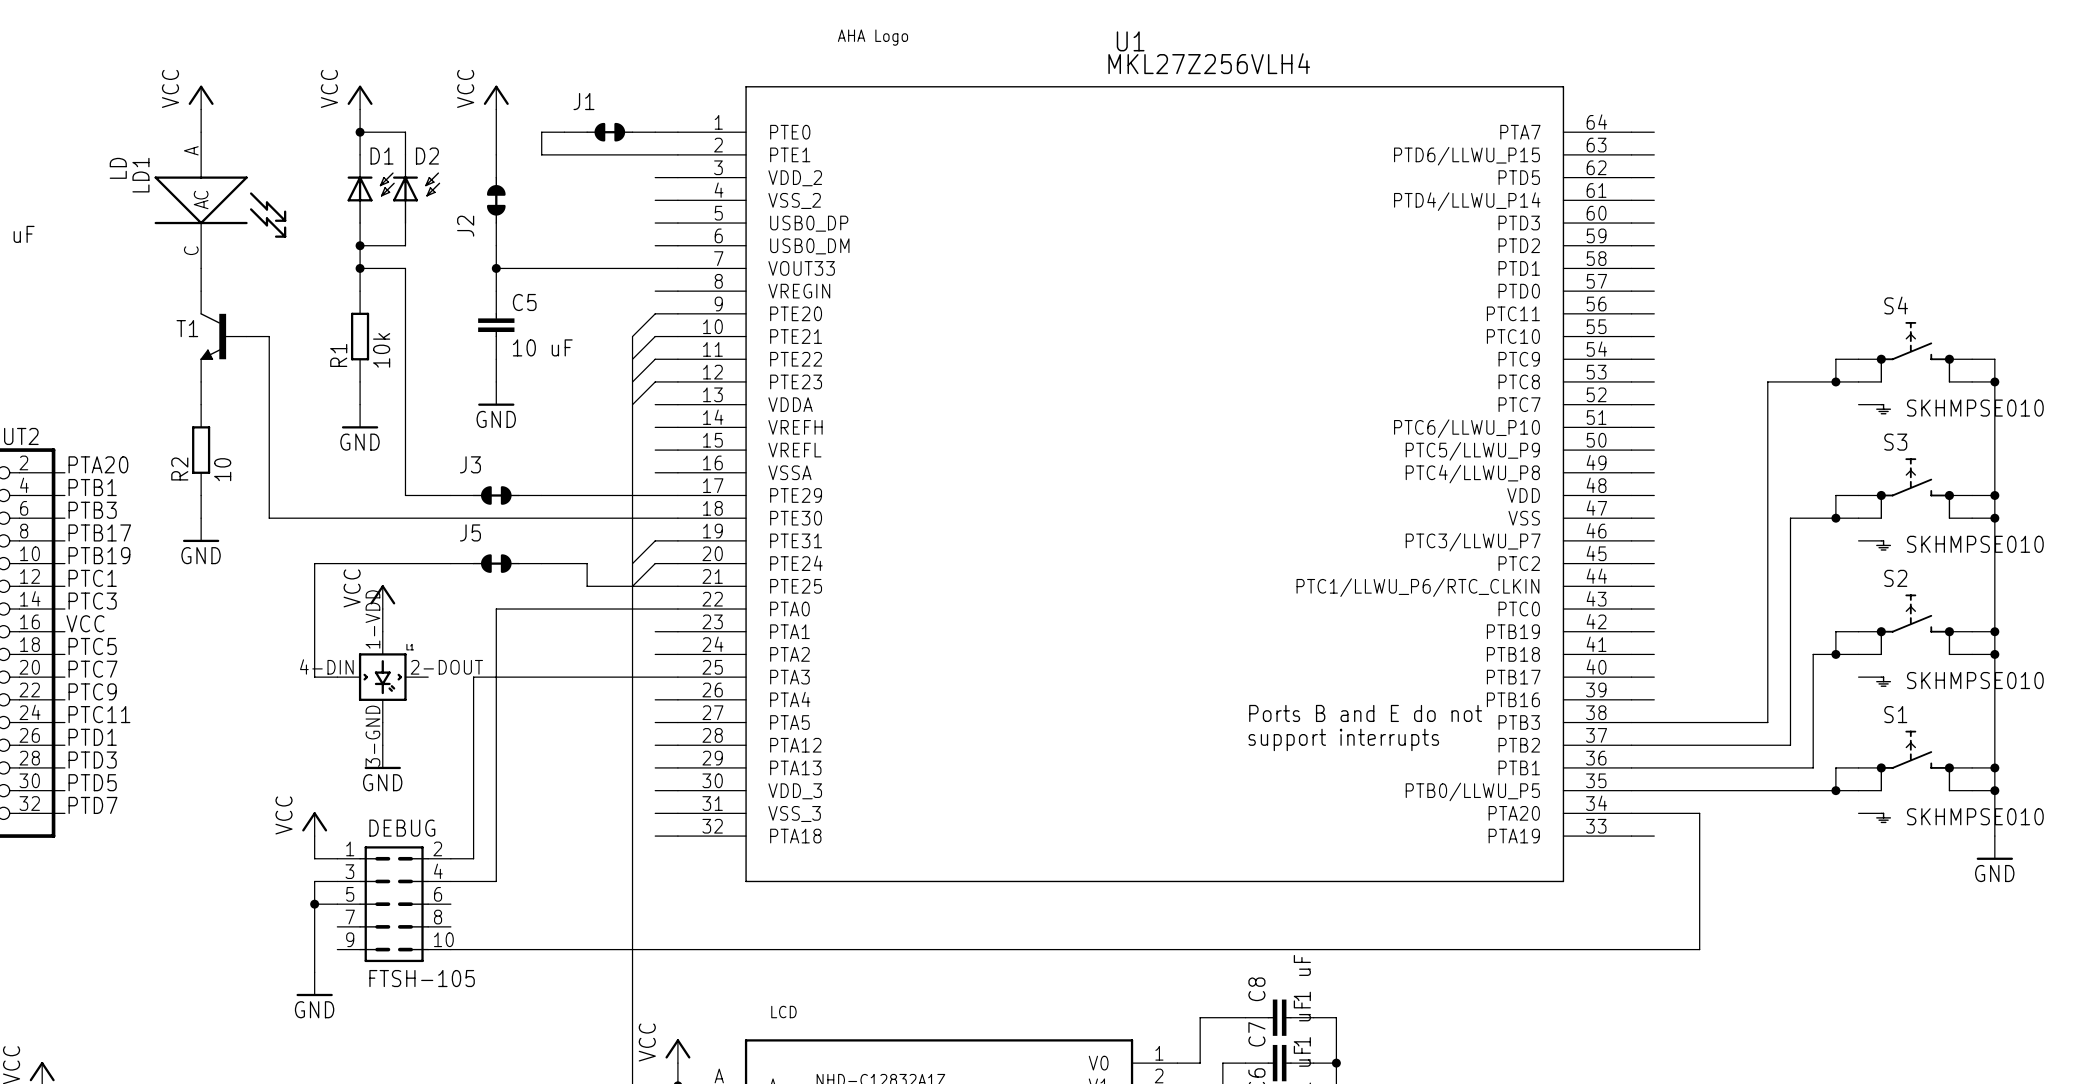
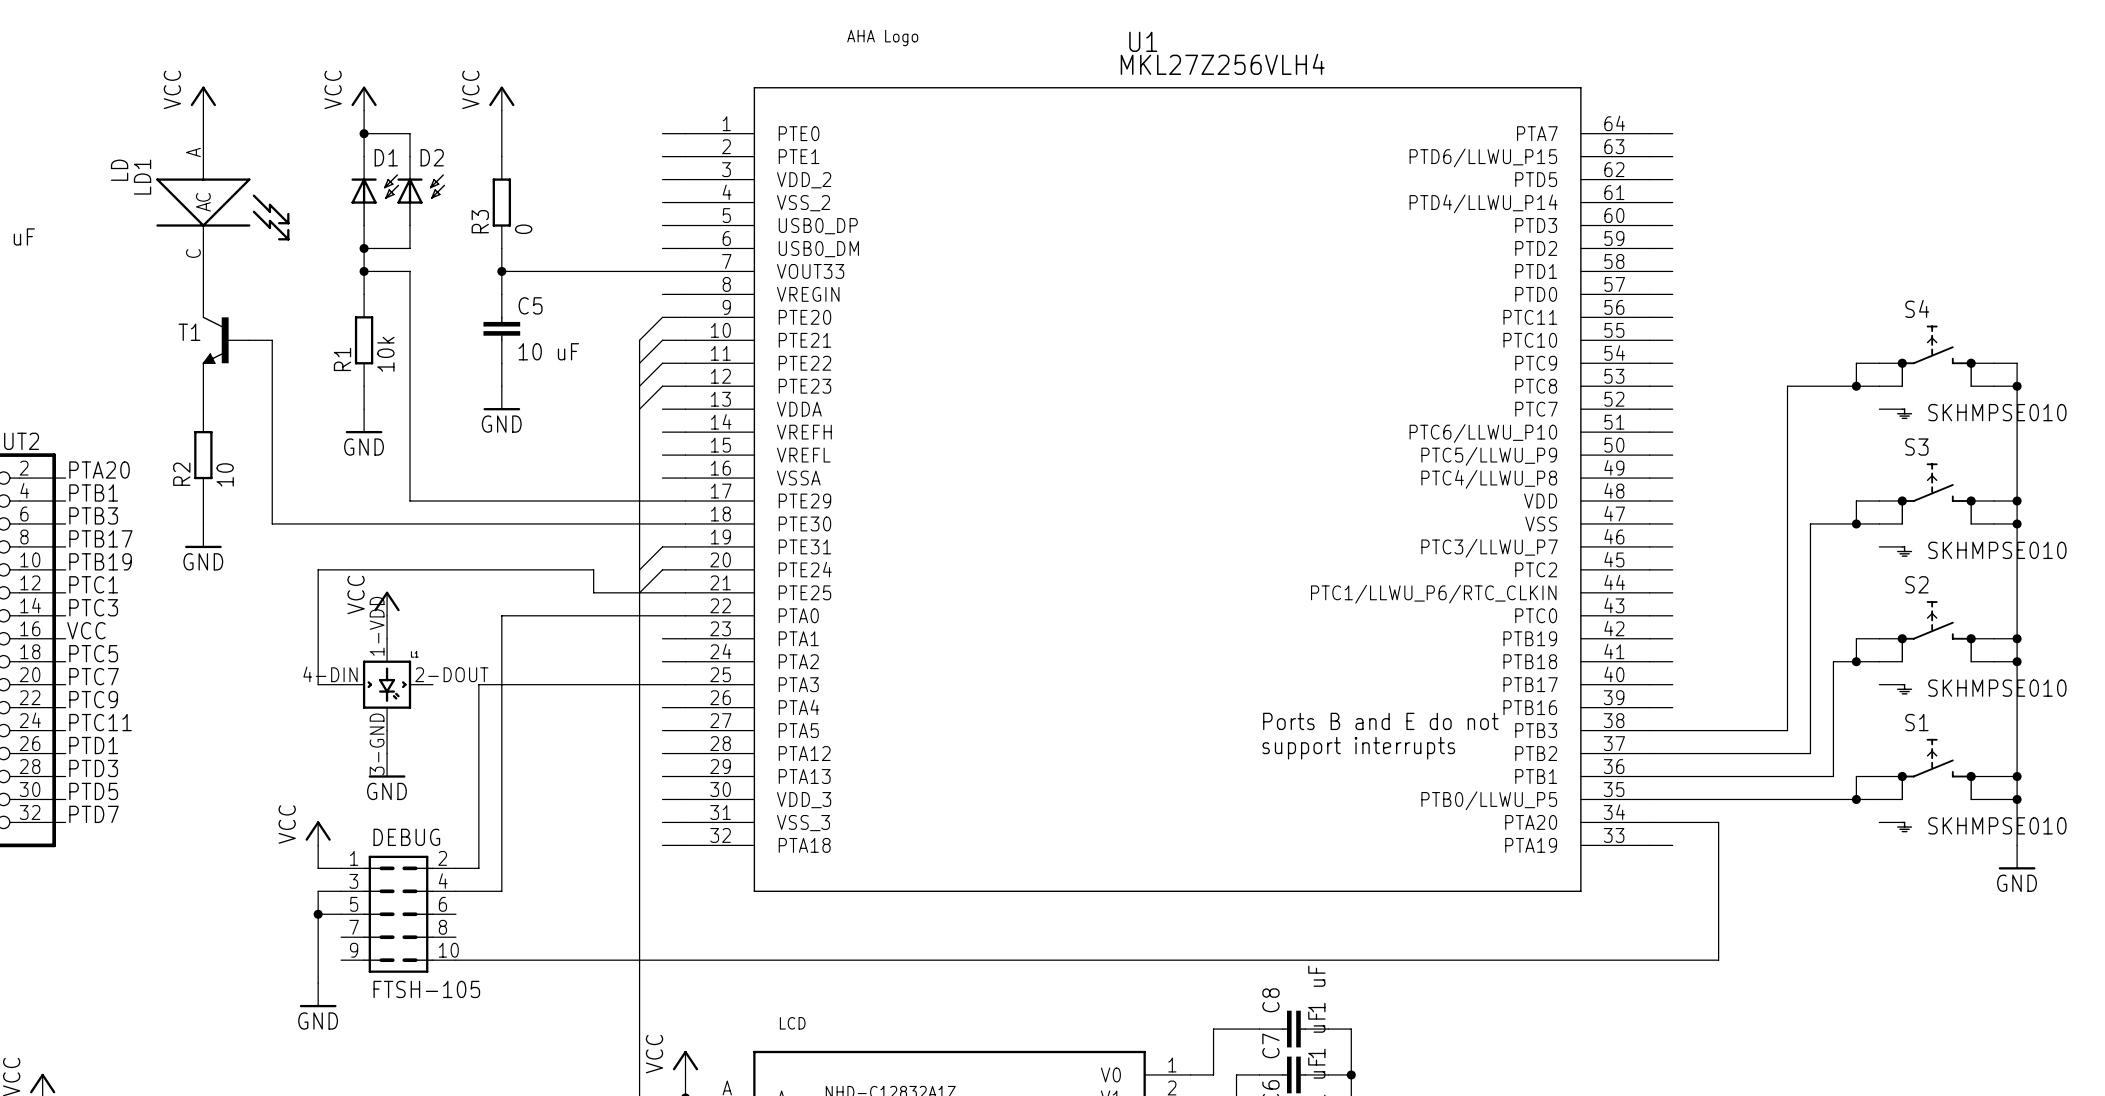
wire: (564, 132) (541, 132) (541, 154) (655, 154) -> none
J1: (609, 132) -> none
J2: (496, 200) -> none
R3: none -> 0 (501, 202)
J3: (496, 495) -> none
J5: (496, 563) -> none

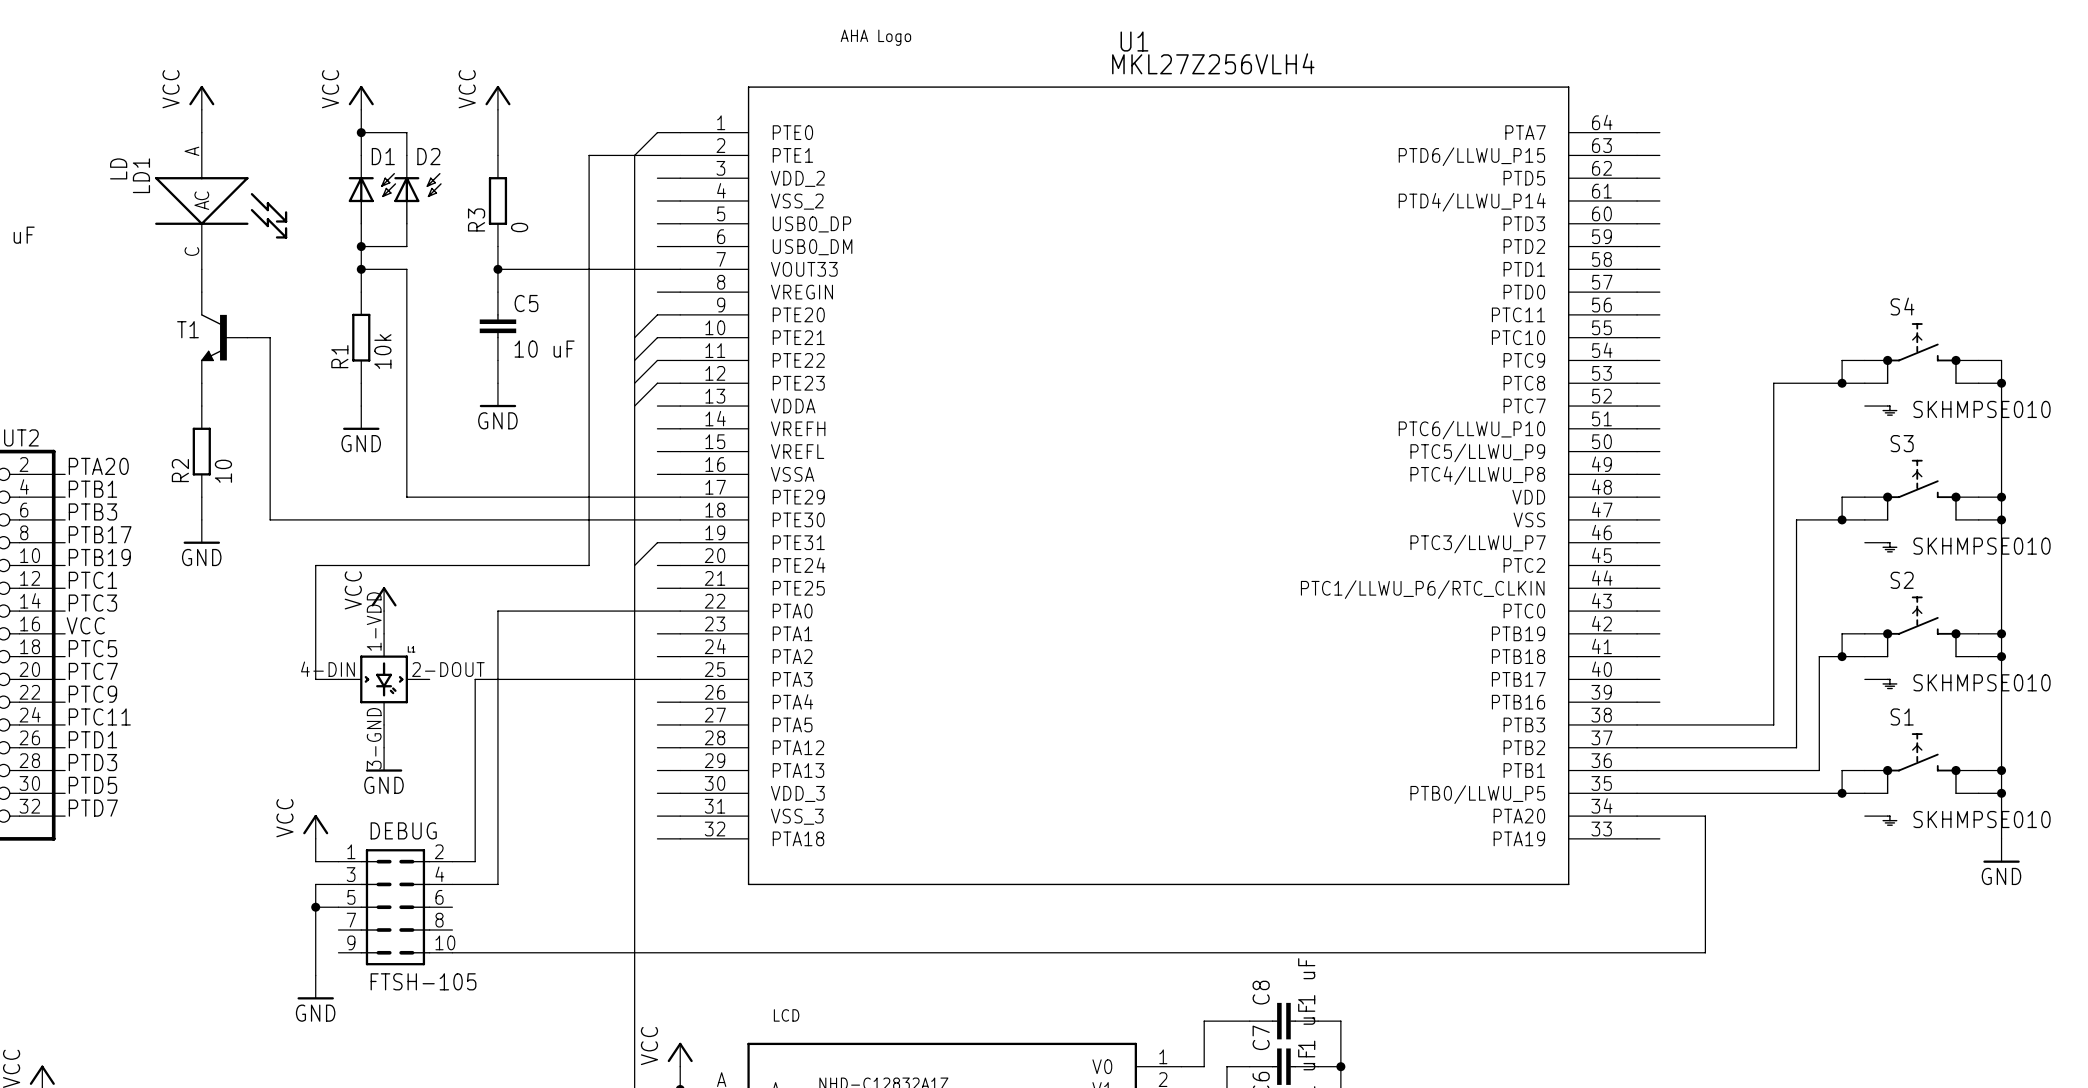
wire: none -> (657, 132) (634, 155)
bus: none -> (634, 155) (634, 337)
wire: (593, 569) (593, 592) (662, 592) -> (589, 565) (589, 155) (657, 155)
wire: (662, 569) (639, 592) -> none
text: Ports B and E do not (1380, 721) -> none
text: support interrupts (1358, 748) -> none

